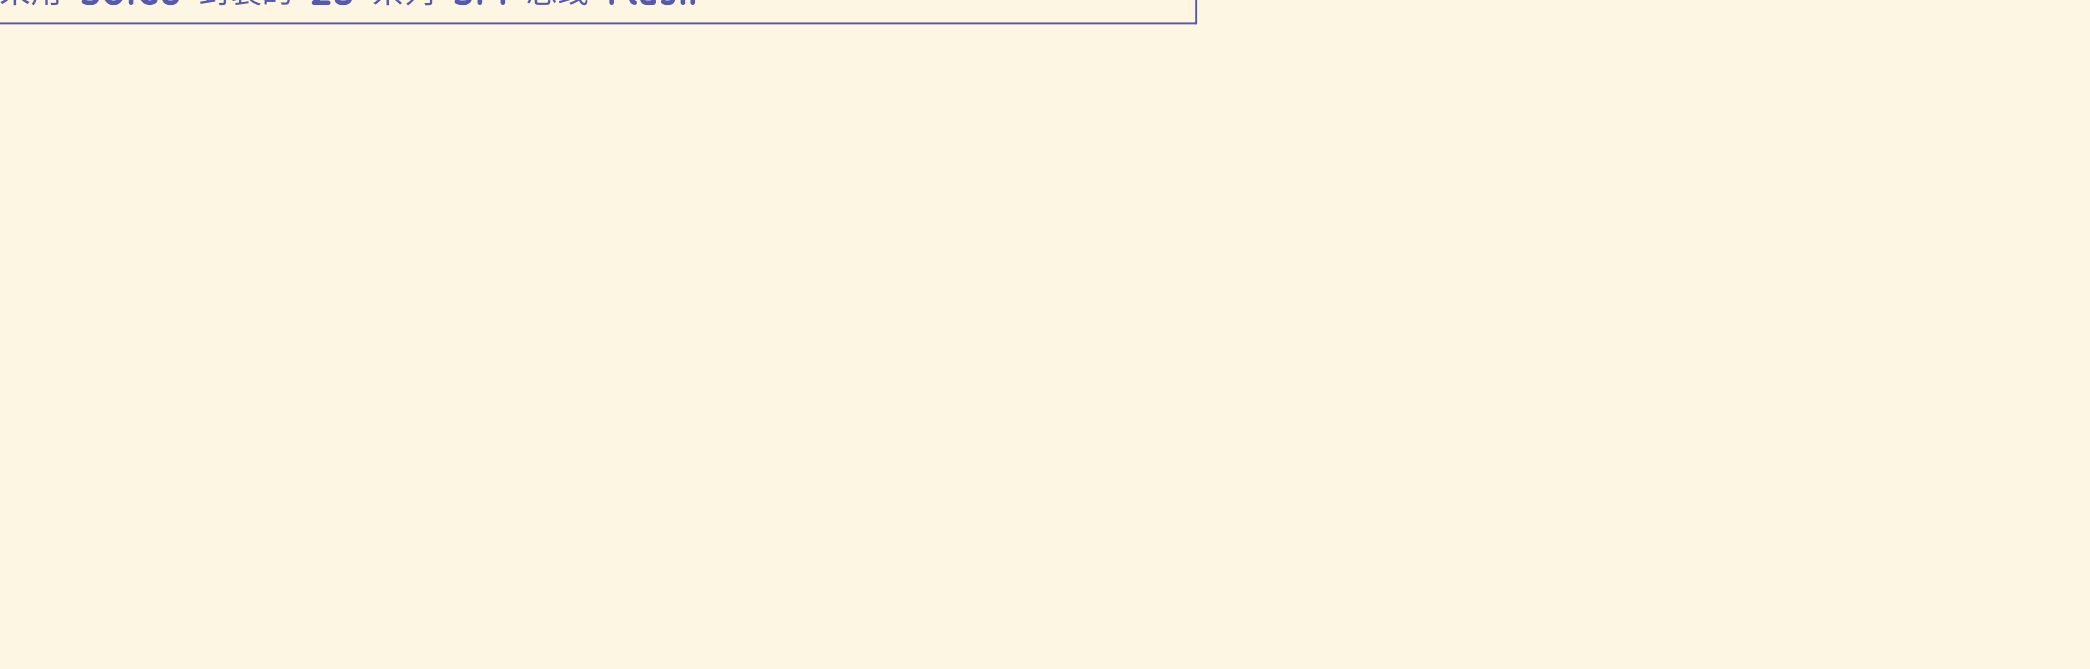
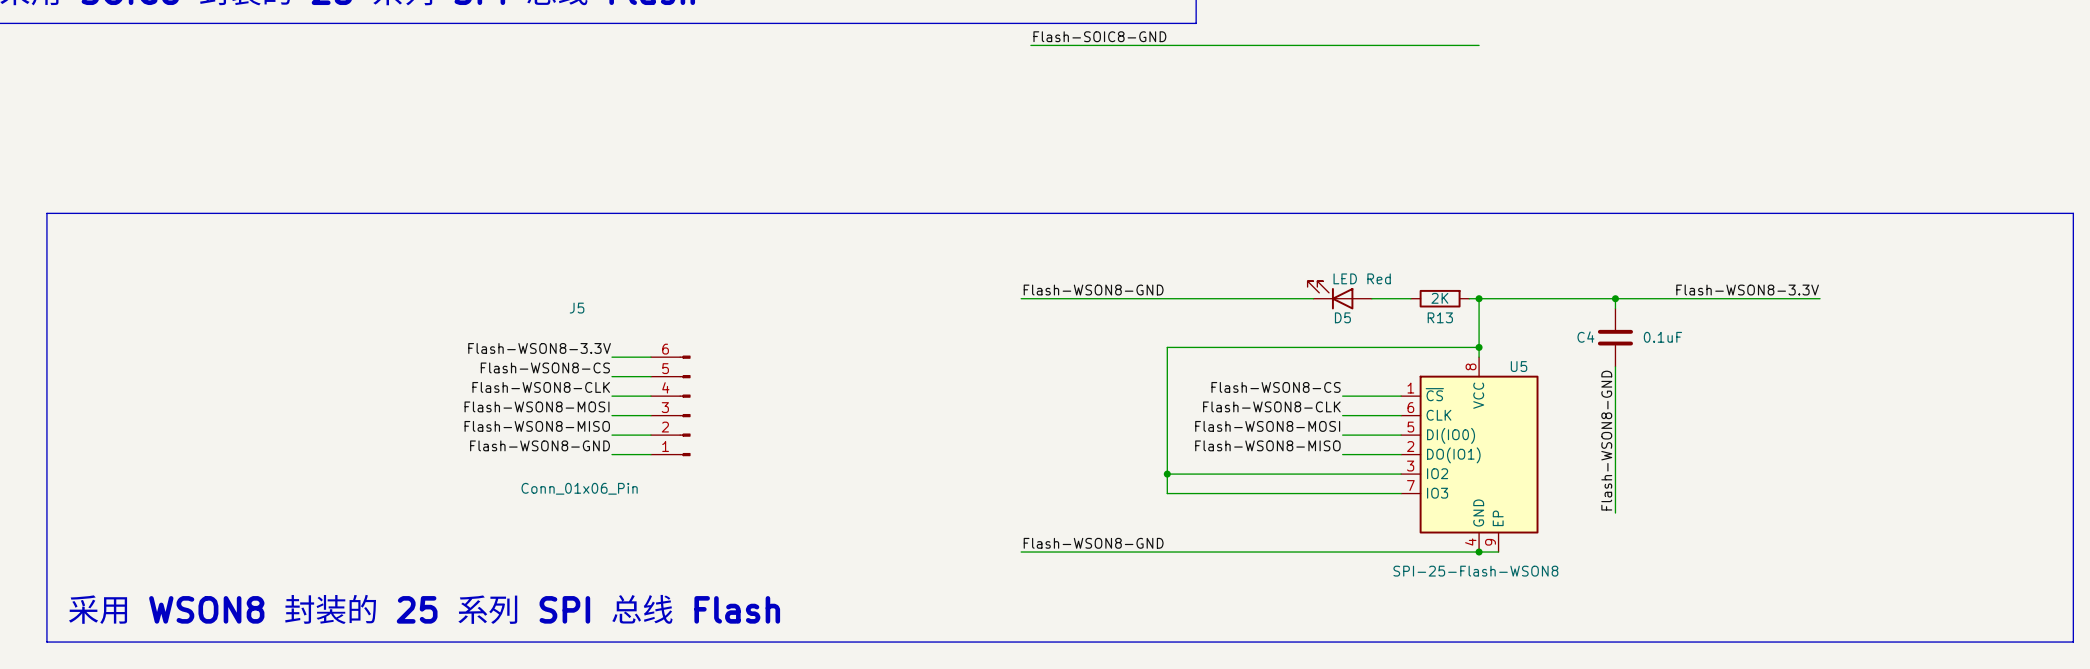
label: none -> Flash-SOIC8-GND (1099, 36)
wire: none -> (1030, 45) (1479, 45)
line: none -> (46, 213) (2073, 213) (2073, 642) (46, 642) (46, 213)
label: none -> Flash-WSON8-GND (1093, 290)
label: none -> Flash-WSON8-3.3V (1747, 290)
D5: none -> LED Red (1339, 295)
wire: none -> (1021, 298) (1313, 298)
wire: none -> (1371, 298) (1410, 298)
R13: none -> 2K (1440, 298)
wire: none -> (1469, 298) (1820, 298)
wire: none -> (1479, 298) (1479, 357)
junction: none -> (1479, 298)
wire: none -> (1615, 298) (1615, 308)
junction: none -> (1615, 298)
C4: none -> 0.1uF (1615, 337)
wire: none -> (1479, 347) (1167, 347) (1167, 493) (1401, 493)
junction: none -> (1479, 347)
label: none -> Flash-WSON8-3.3V (539, 348)
wire: none -> (612, 357) (650, 357)
wire: none -> (1615, 366) (1615, 513)
label: none -> Flash-WSON8-CS (545, 367)
wire: none -> (612, 376) (650, 376)
label: none -> Flash-WSON8-CLK (541, 387)
label: none -> Flash-WSON8-CS (1276, 387)
wire: none -> (612, 396) (650, 396)
wire: none -> (1342, 396) (1401, 396)
J5: none -> Conn_01x06_Pin (670, 405)
label: none -> Flash-WSON8-MOSI (537, 406)
label: none -> Flash-WSON8-CLK (1271, 406)
wire: none -> (612, 415) (650, 415)
wire: none -> (1342, 415) (1401, 415)
label: none -> Flash-WSON8-MISO (537, 426)
label: none -> Flash-WSON8-MOSI (1267, 426)
wire: none -> (612, 435) (650, 435)
wire: none -> (1342, 435) (1401, 435)
label: none -> Flash-WSON8-GND (1606, 440)
label: none -> Flash-WSON8-GND (540, 445)
label: none -> Flash-WSON8-MISO (1267, 445)
wire: none -> (612, 454) (650, 454)
wire: none -> (1342, 454) (1401, 454)
U5: none -> SPI-25-Flash-WSON8 (1469, 454)
wire: none -> (1167, 474) (1401, 474)
junction: none -> (1167, 474)
label: none -> Flash-WSON8-GND (1093, 543)
wire: none -> (1021, 552) (1498, 552)
junction: none -> (1479, 552)
text: none -> 采用 WSON8 封装的 25 系列 SPI 总线 Flash (423, 609)

